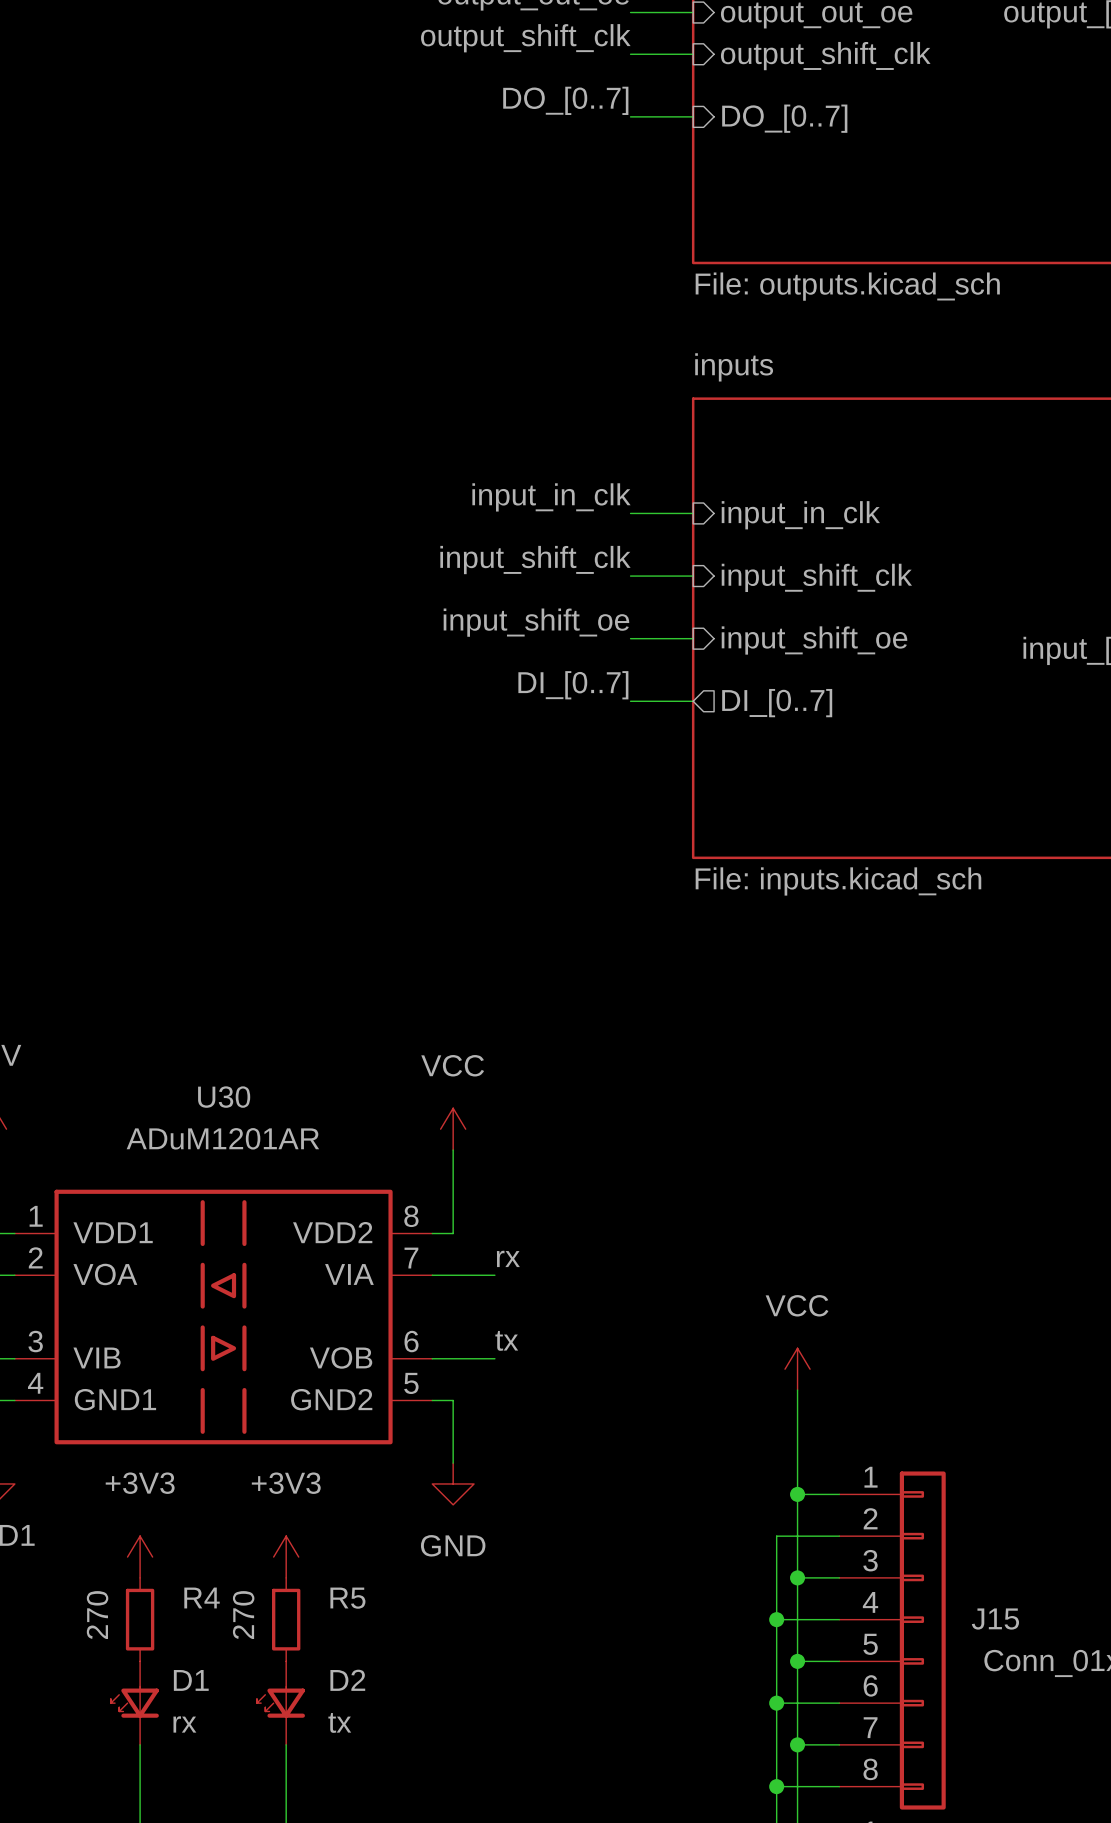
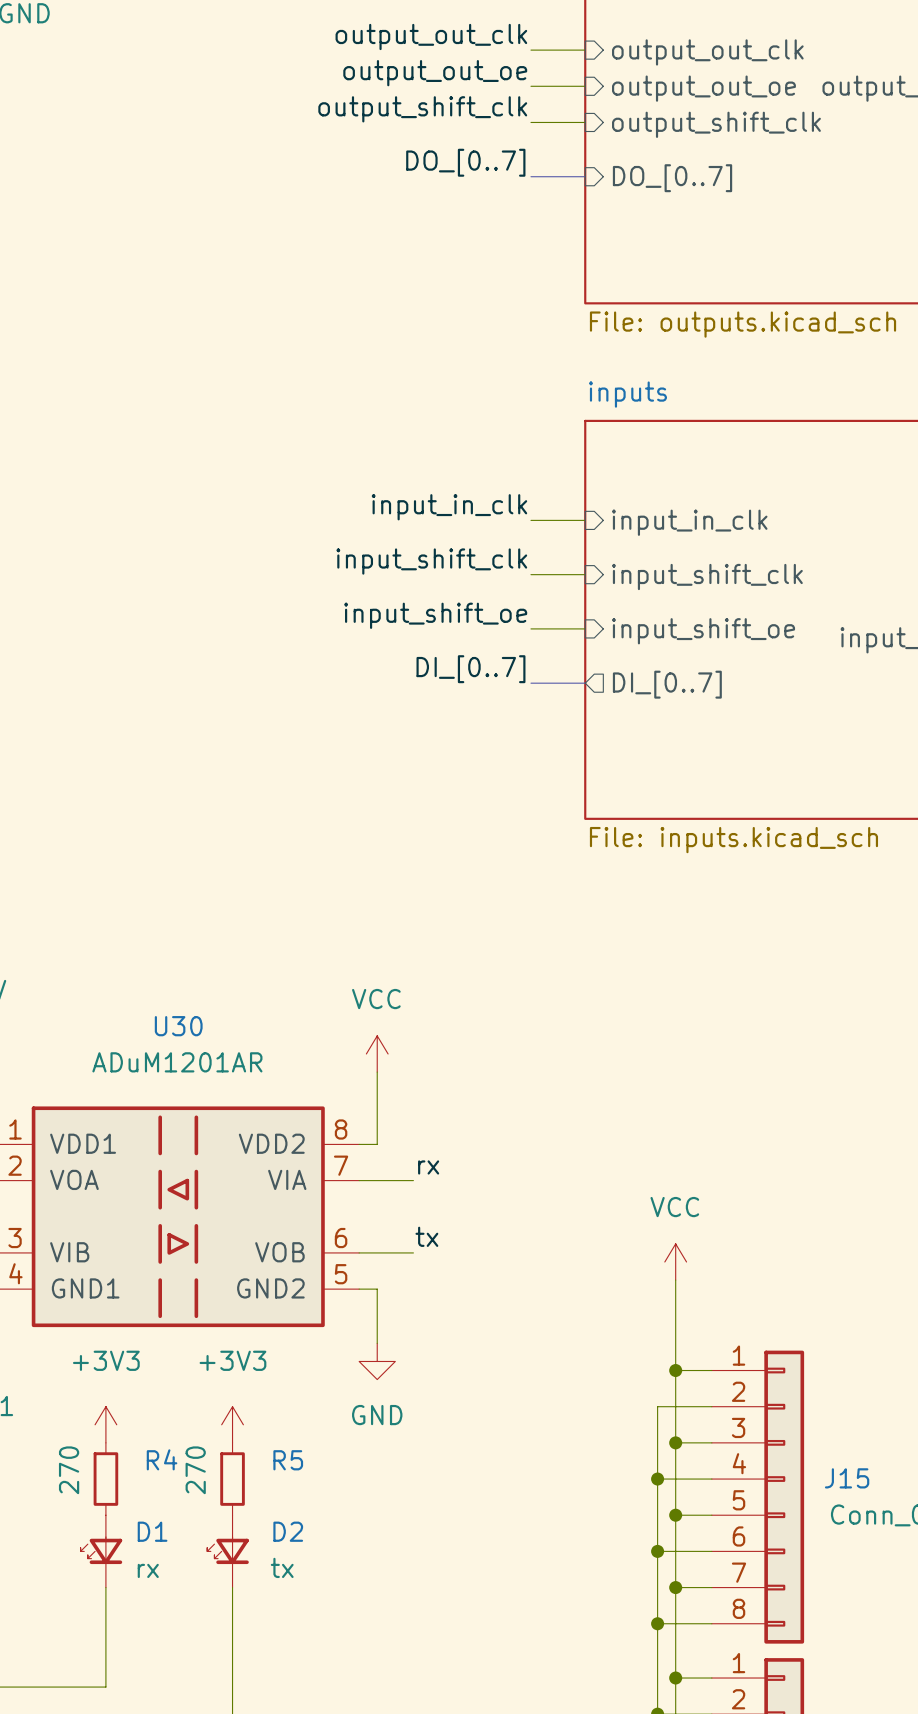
bus: none -> (530, 176) (585, 176)
bus: none -> (530, 683) (585, 683)

